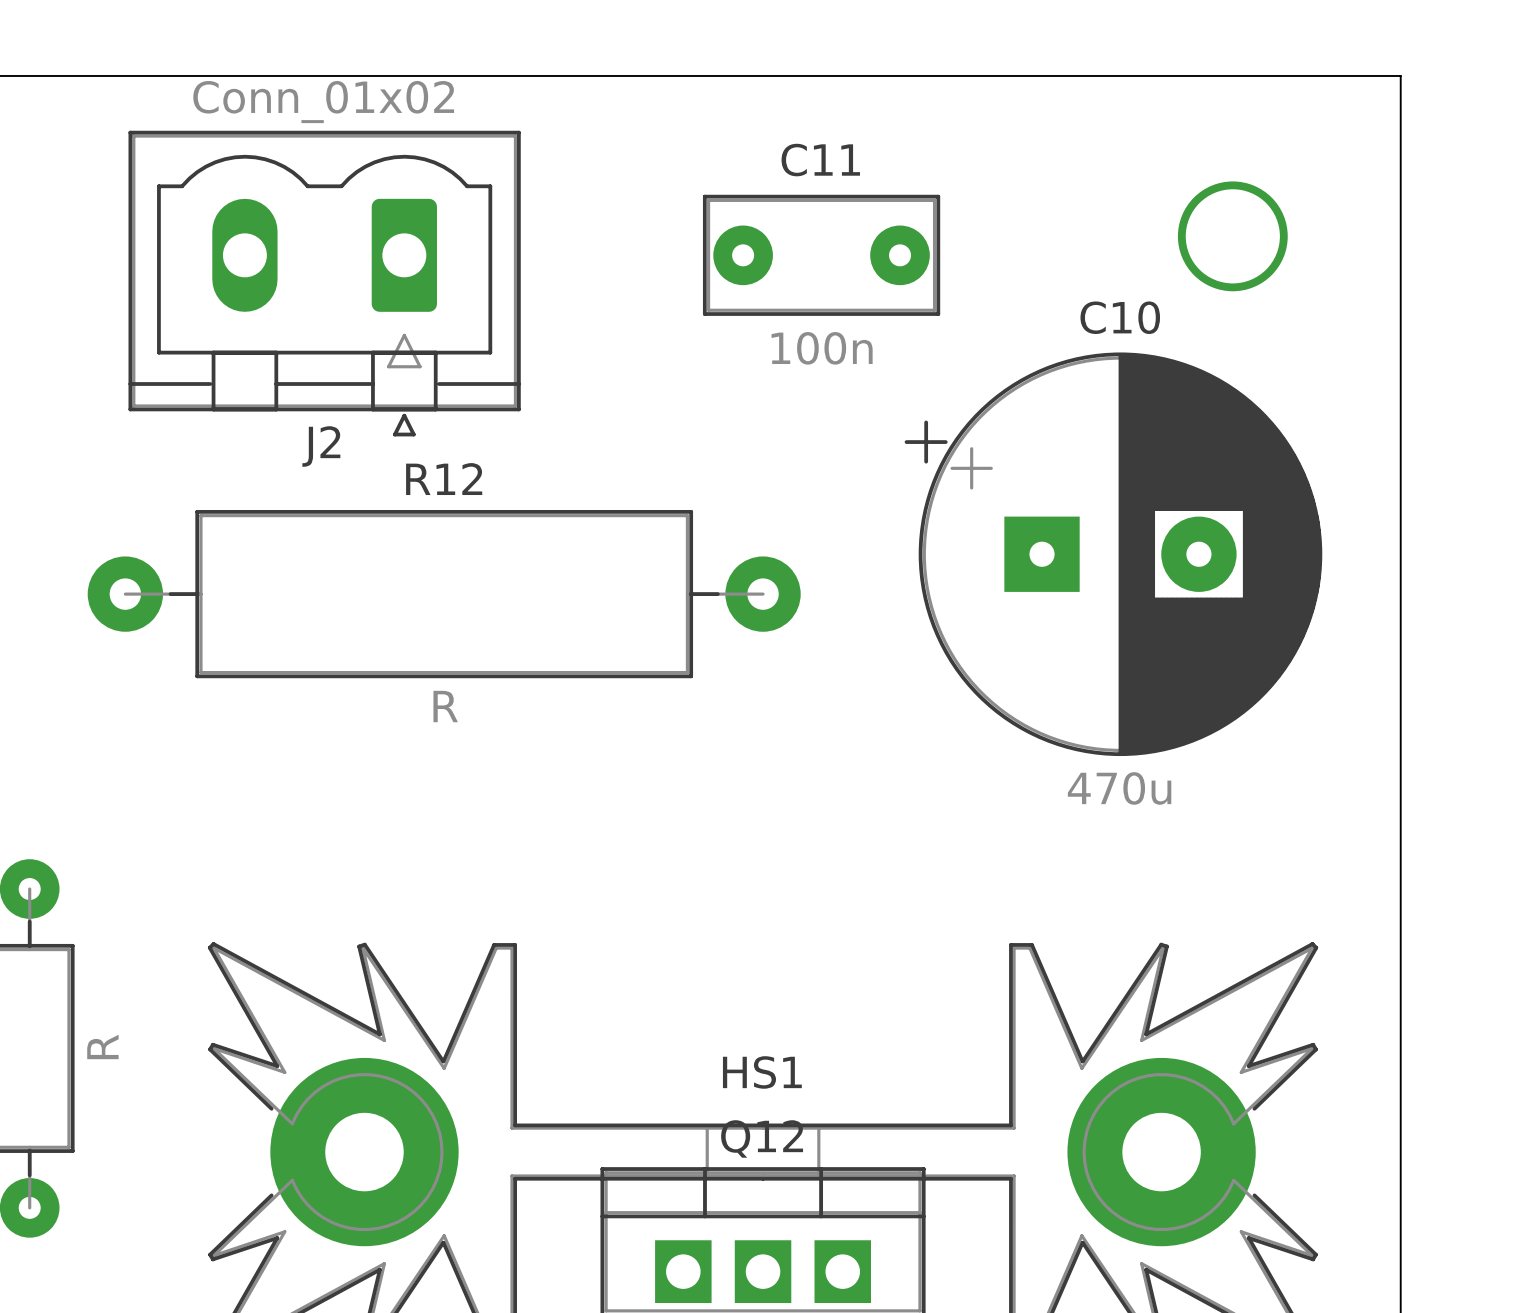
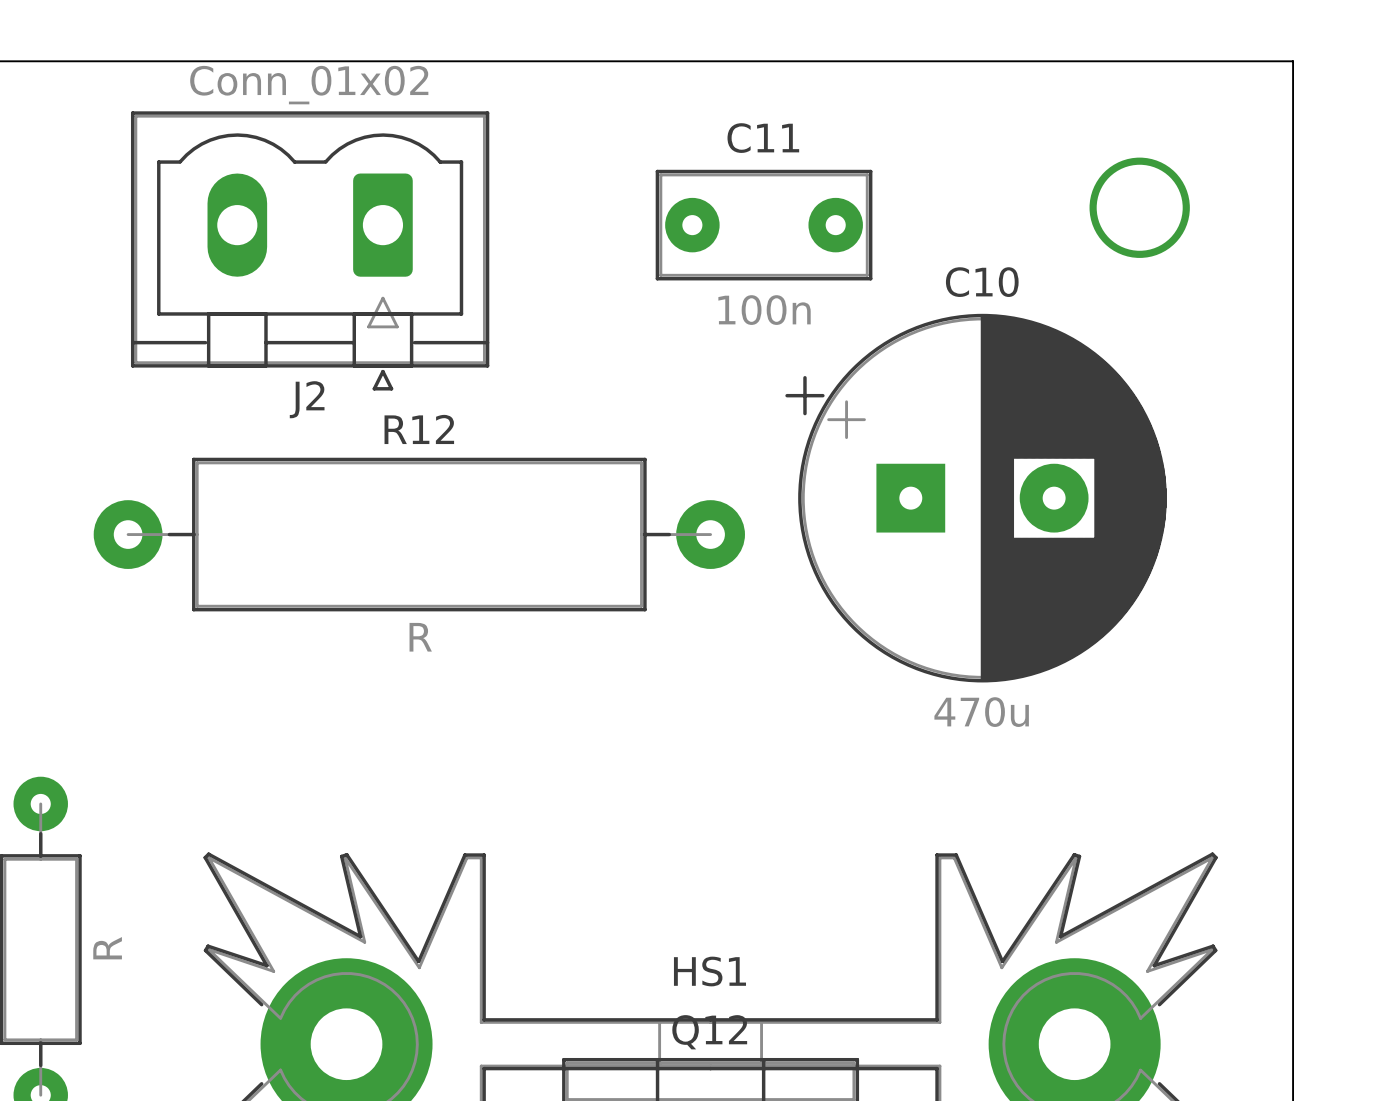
C10 position: (1113, 554) -> (976, 498)

